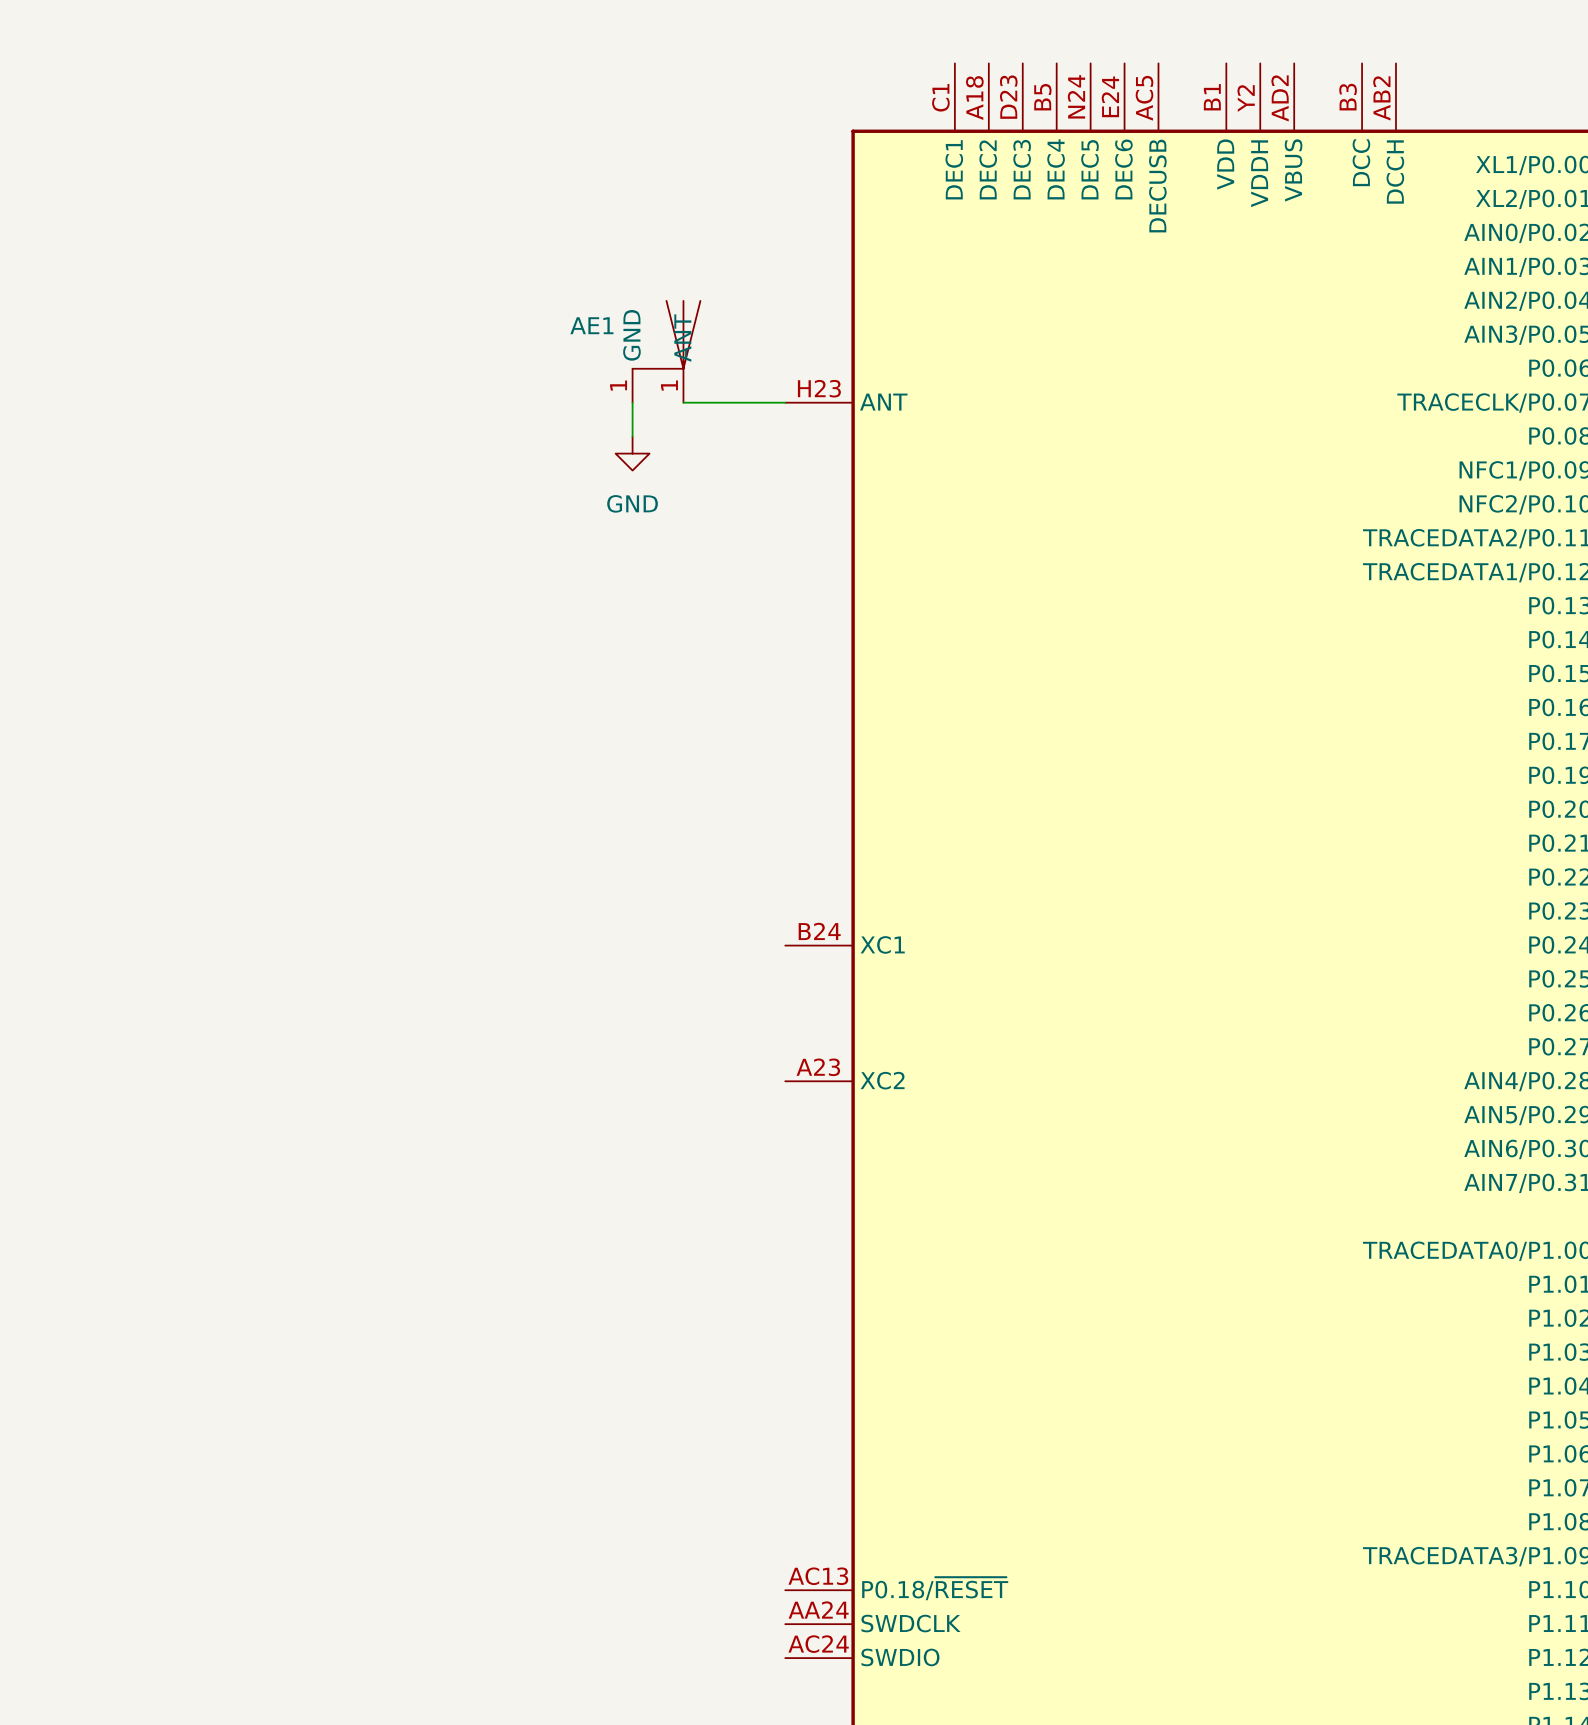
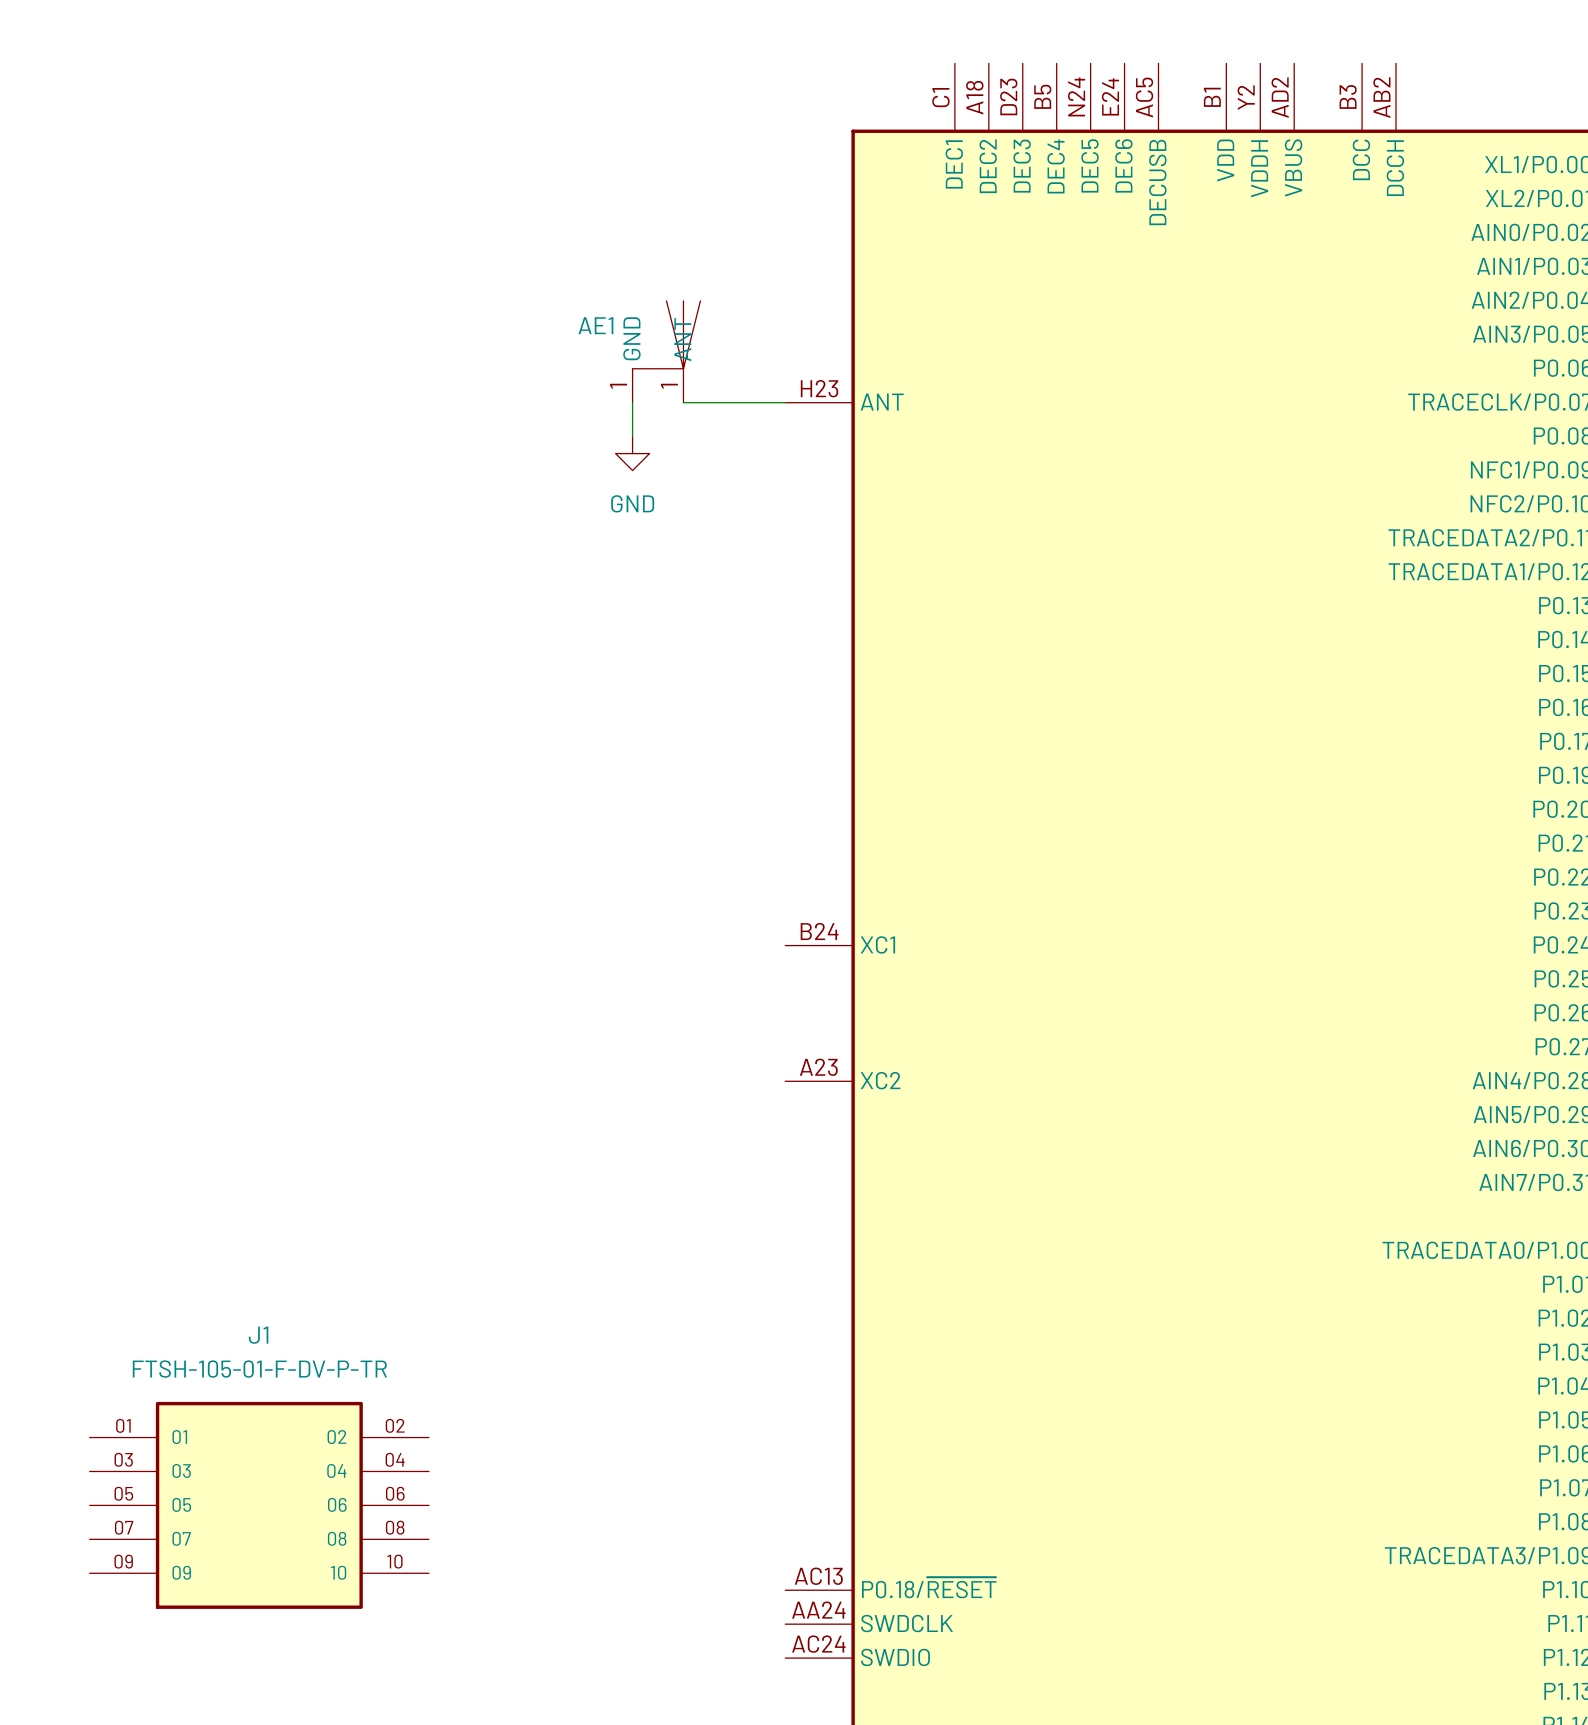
J1: none -> FTSH-105-01-F-DV-P-TR (259, 1505)

